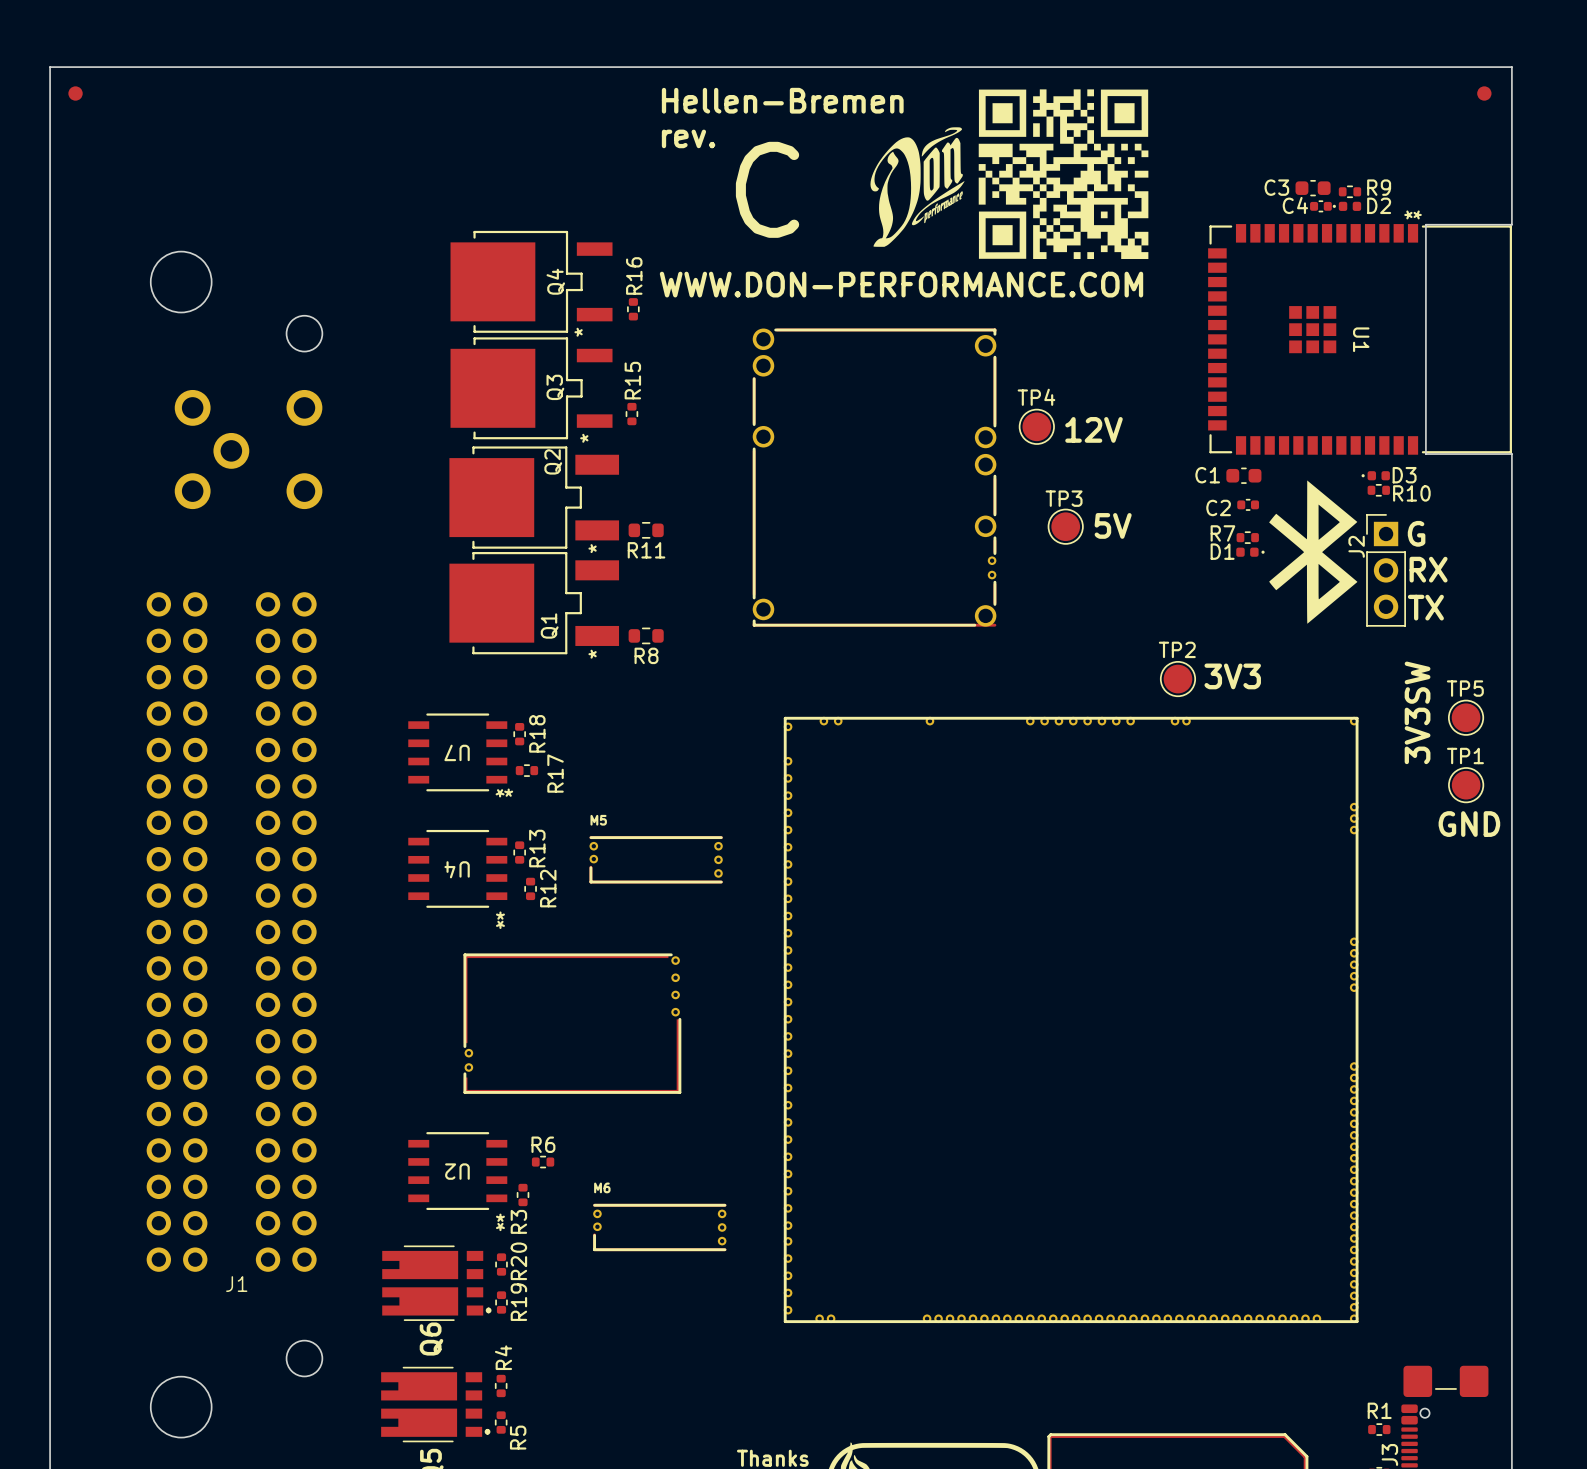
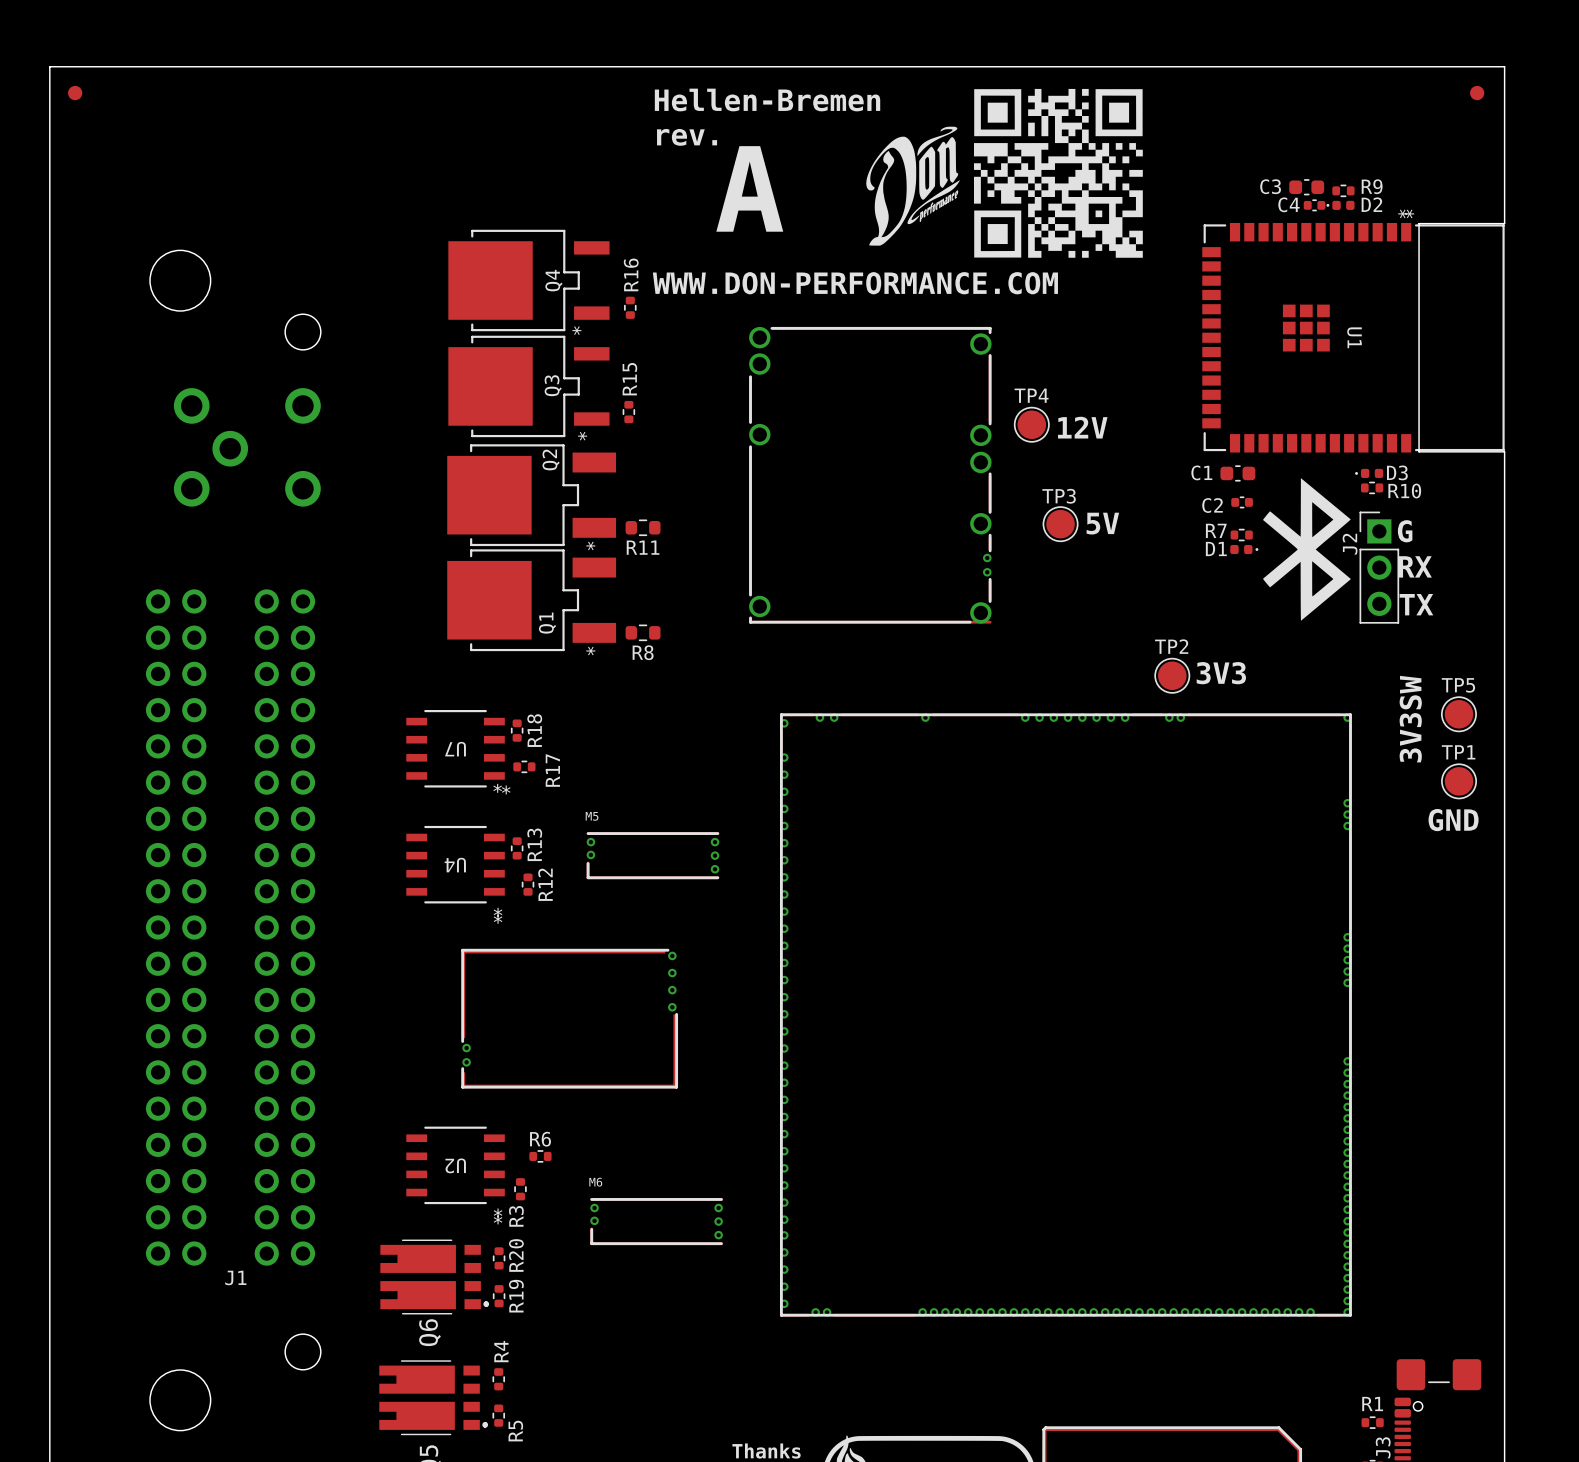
text: C (767, 189) -> A (749, 188)
part footprint: [783, 716, 1359, 1324] -> [779, 713, 1352, 1317]

